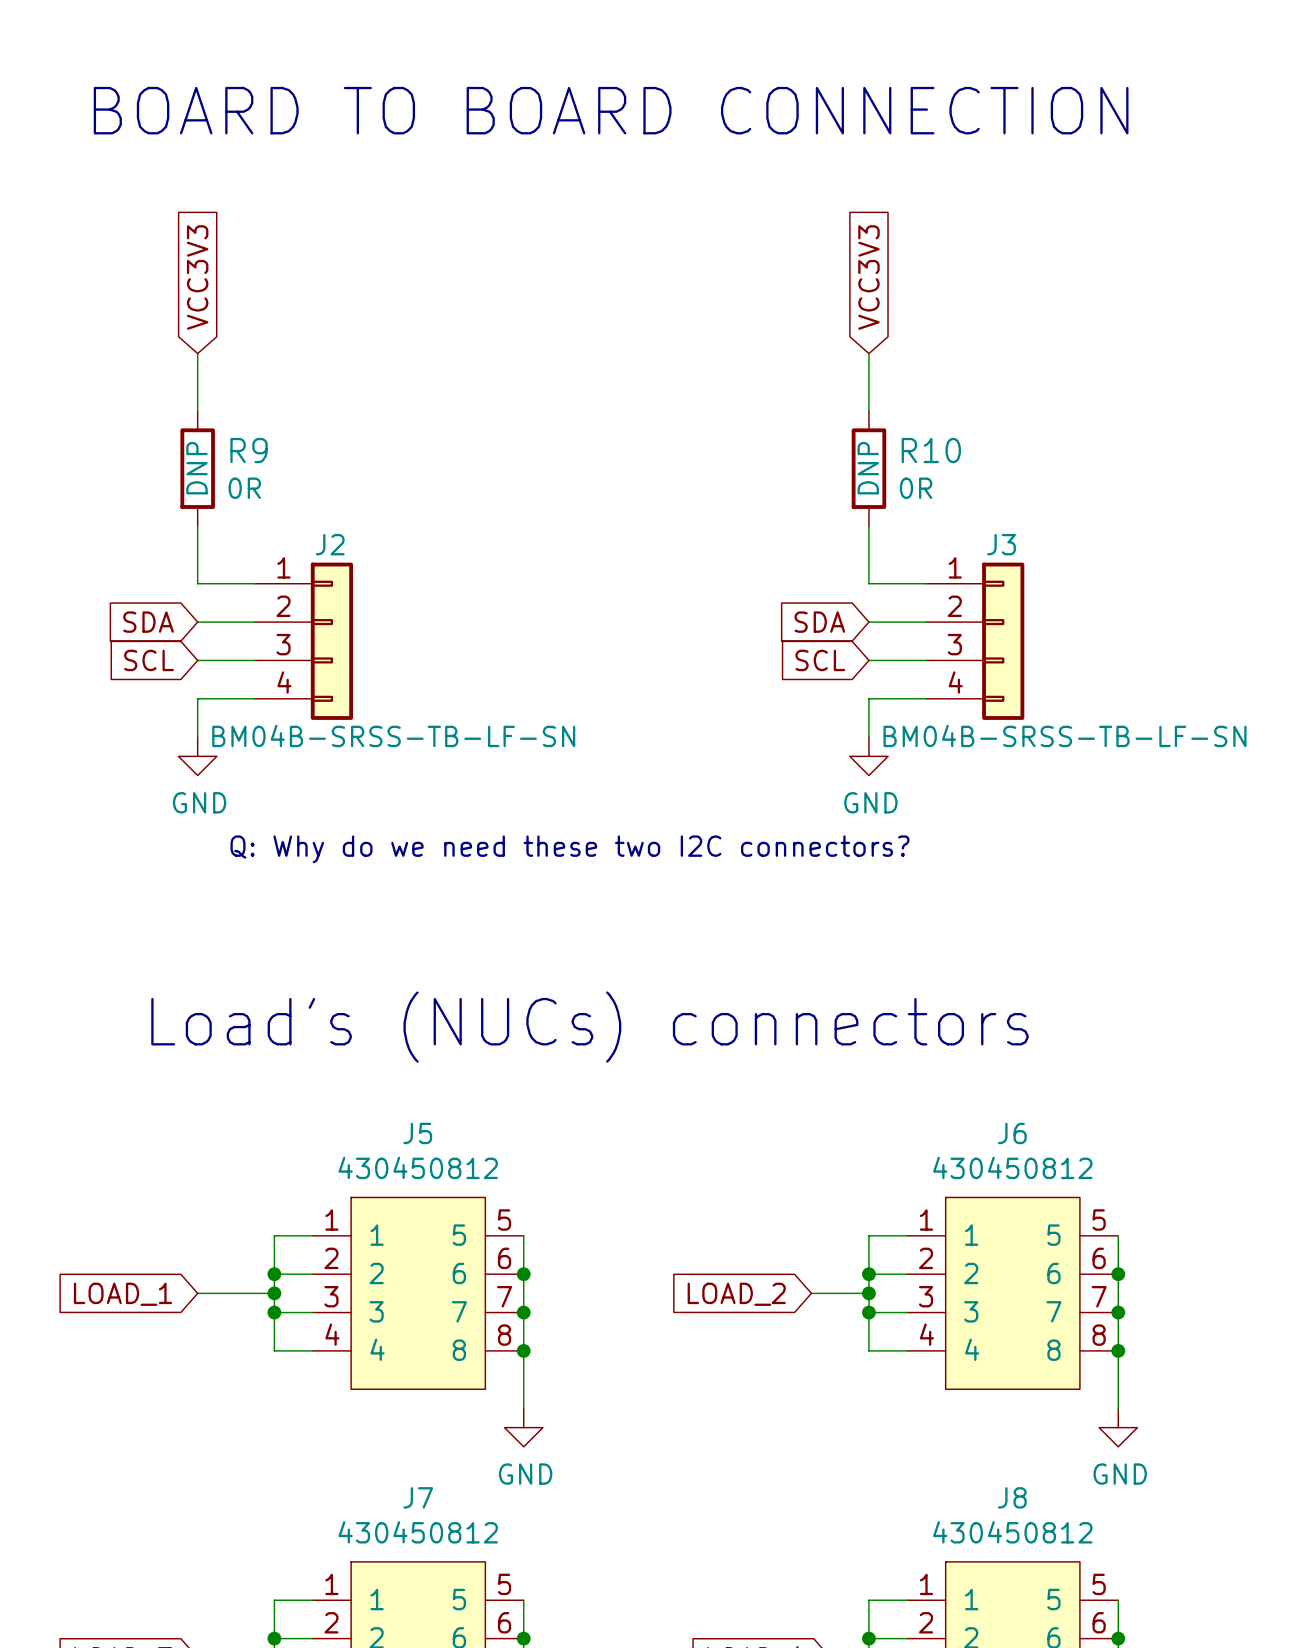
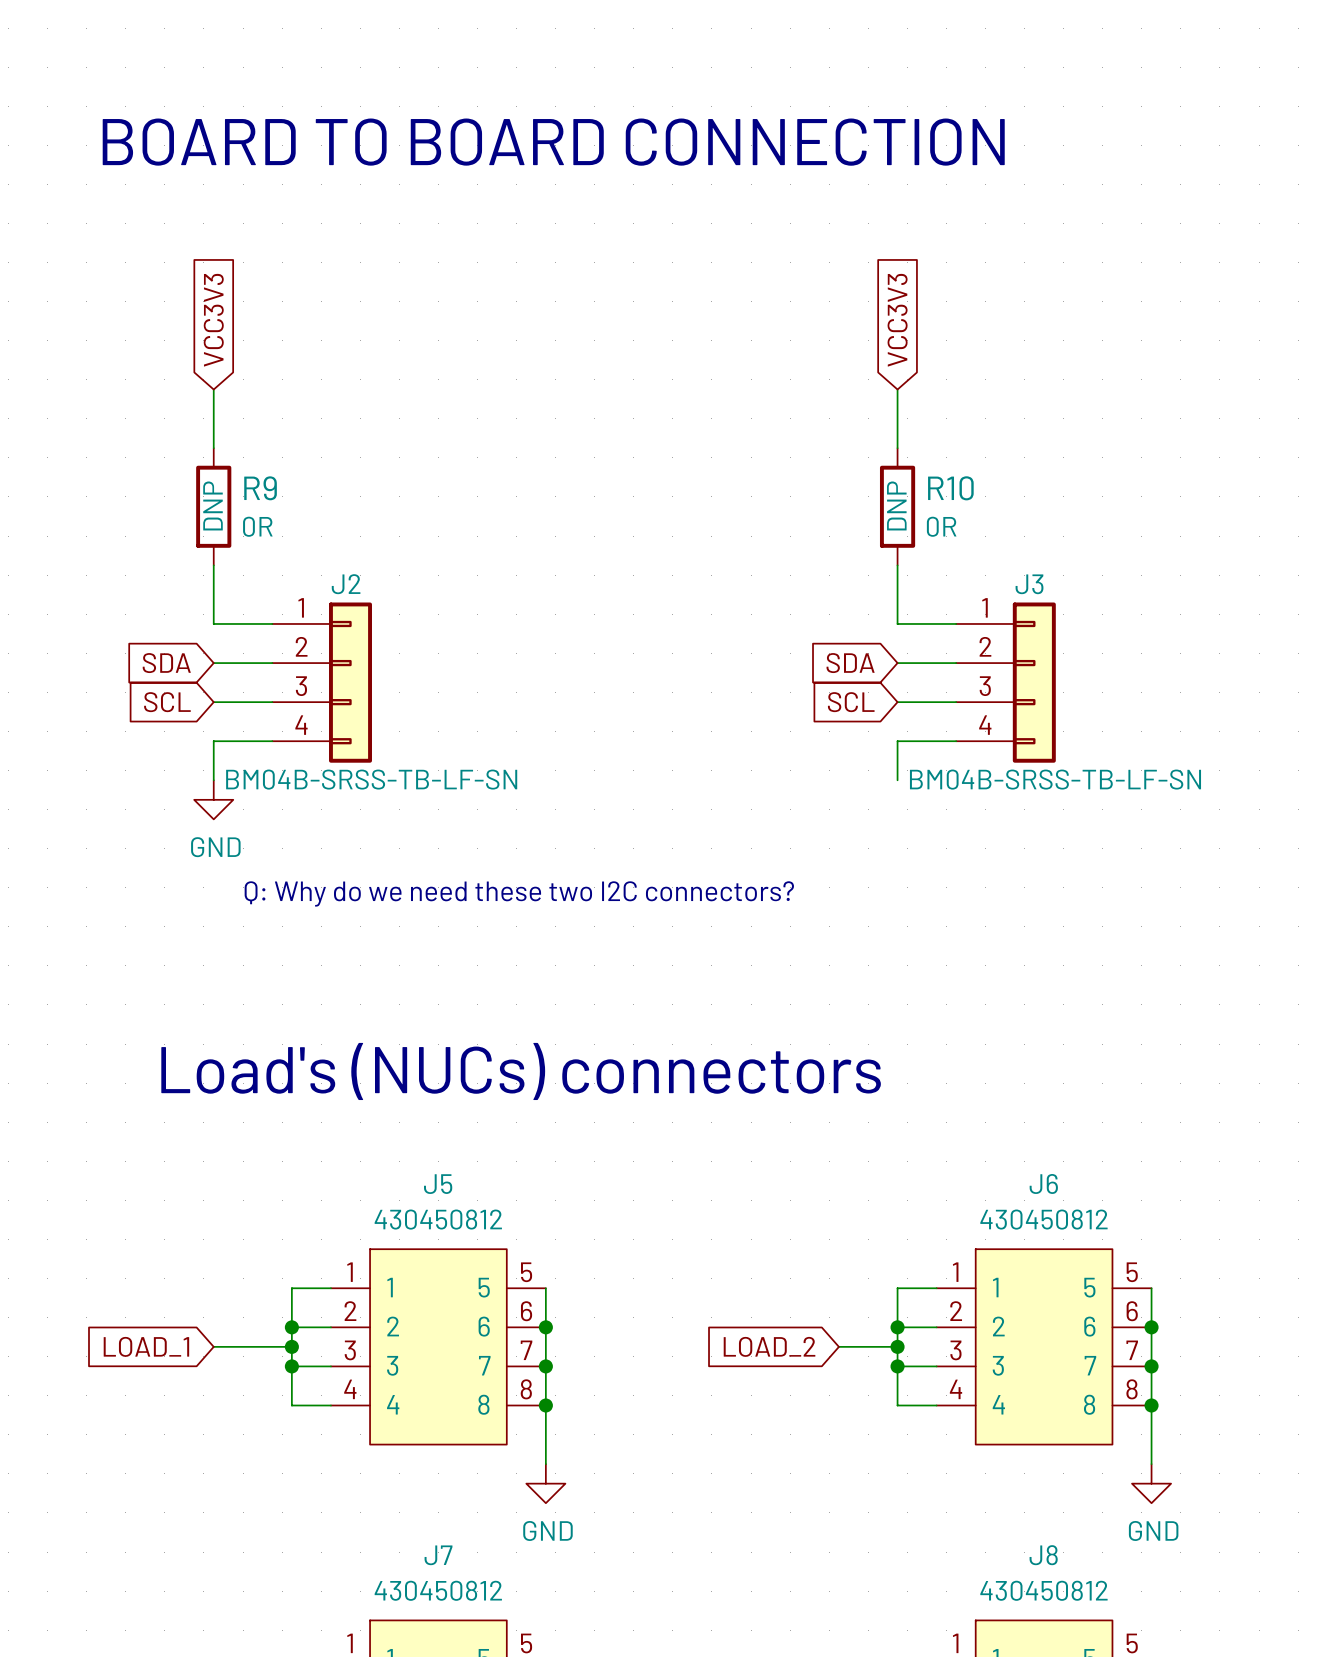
power symbol: GND (868, 756) -> none

